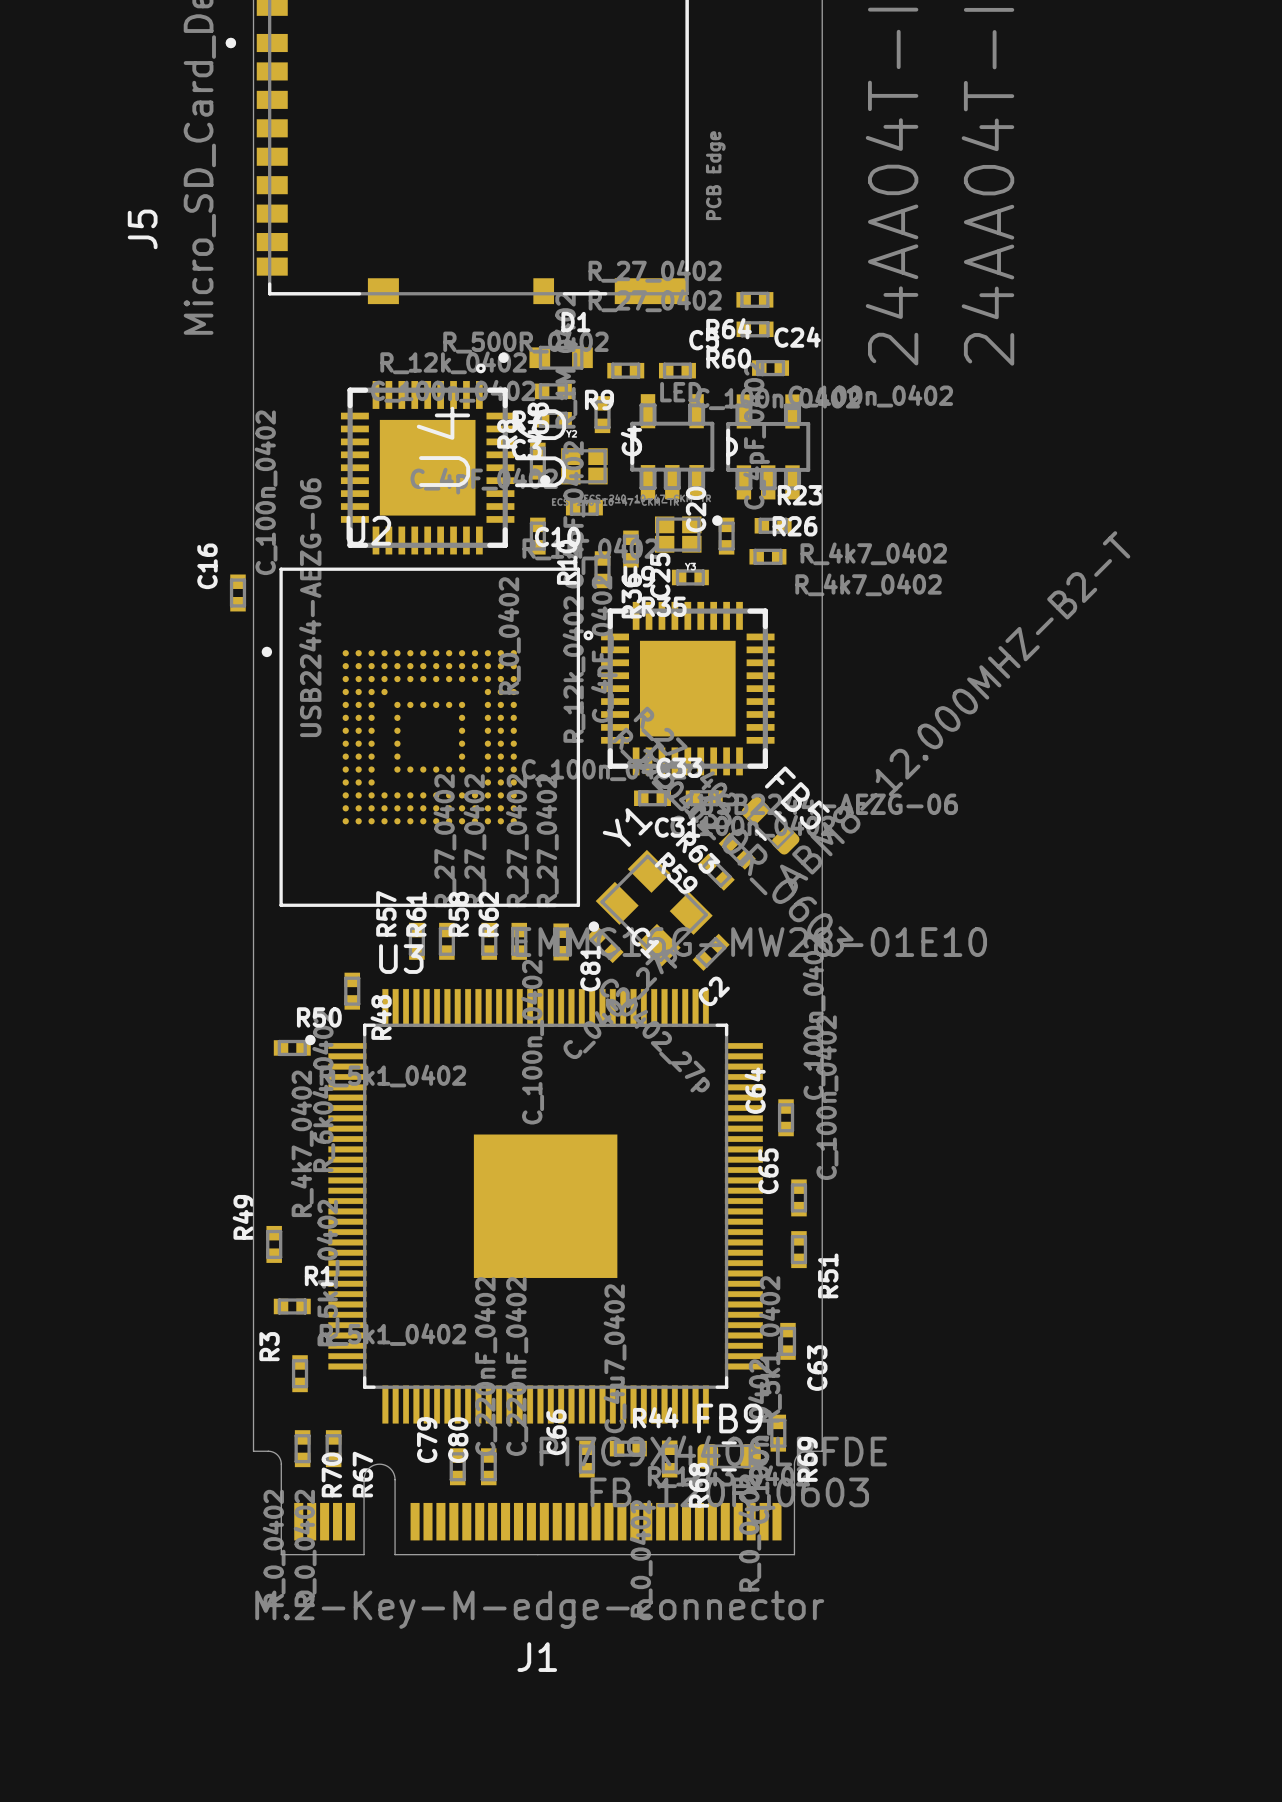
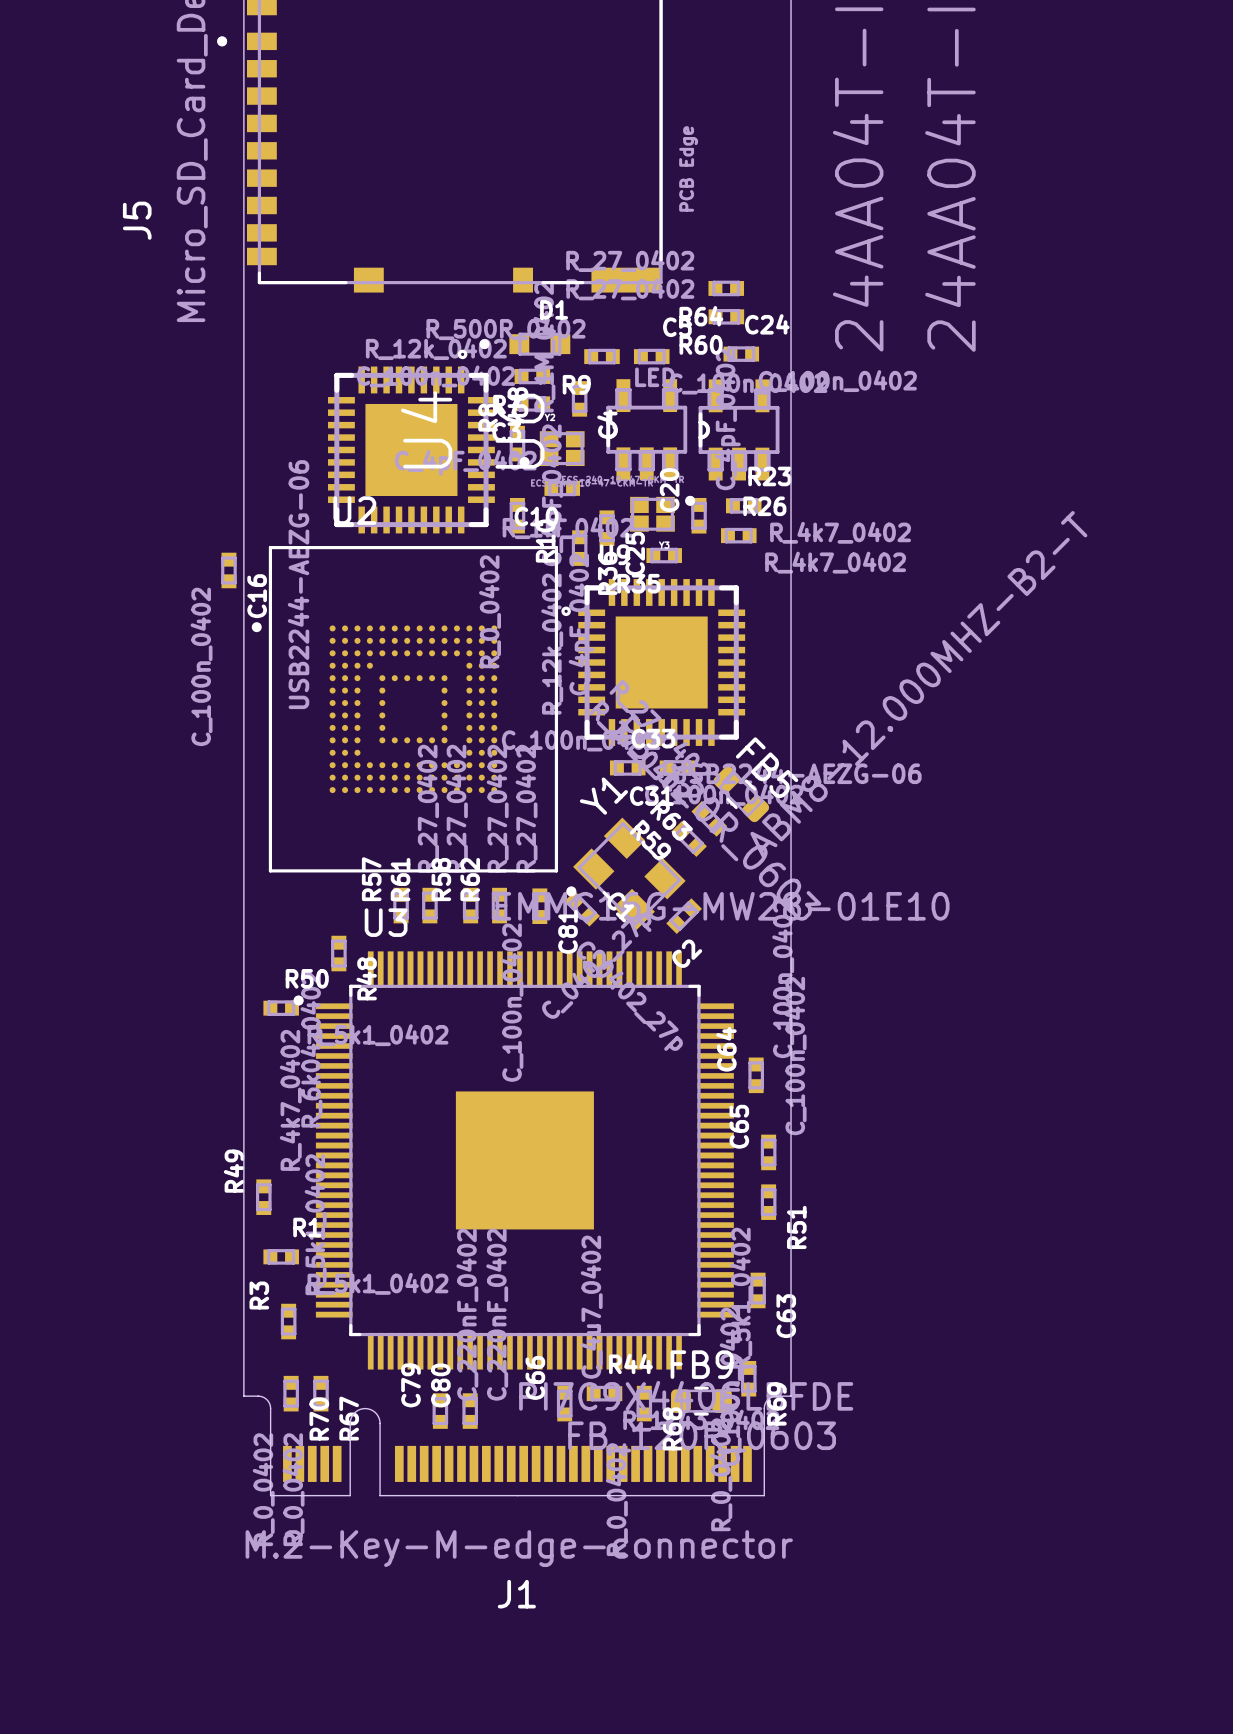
C16 value position: C_100n_0402 (266, 492) -> C_100n_0402 (201, 666)
C16 name position: C16 (207, 566) -> C16 (257, 596)

